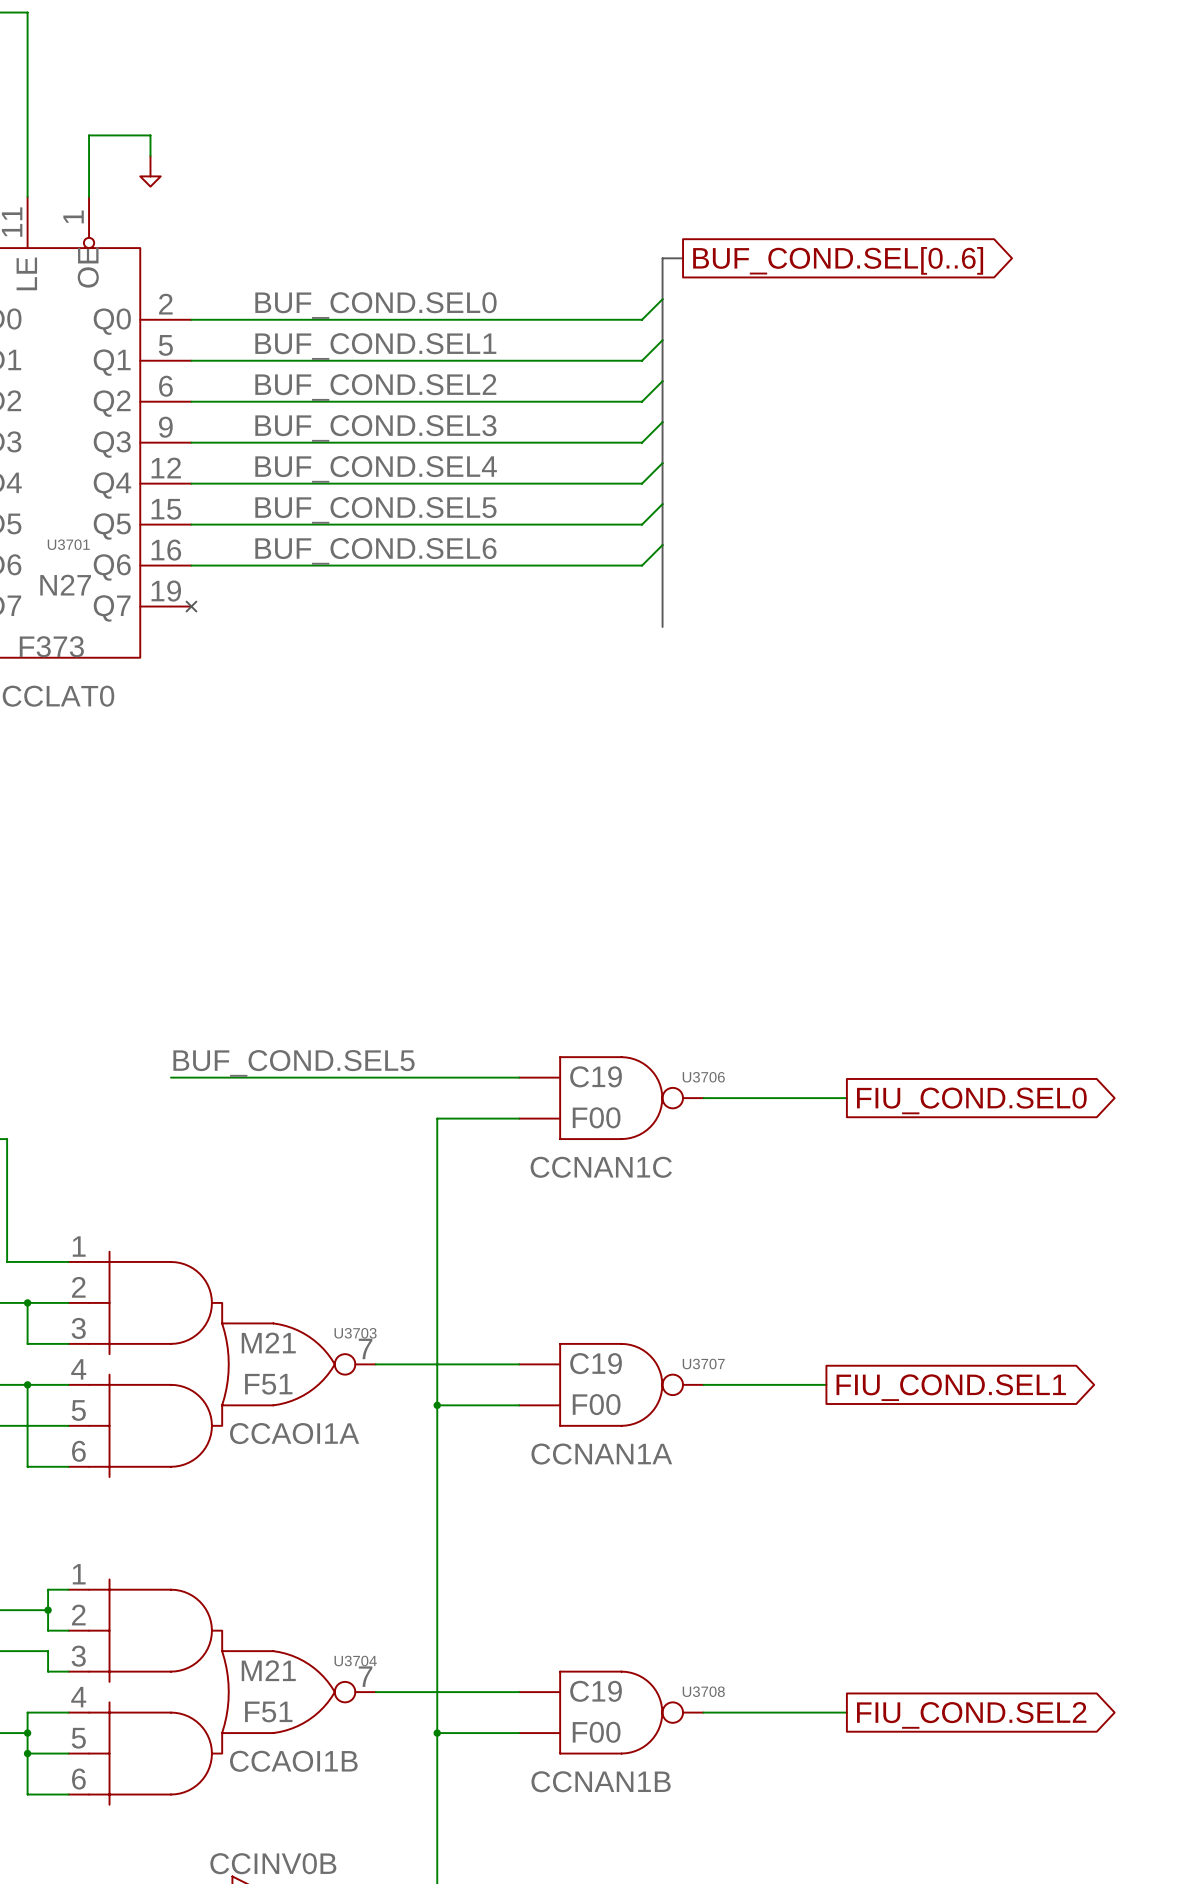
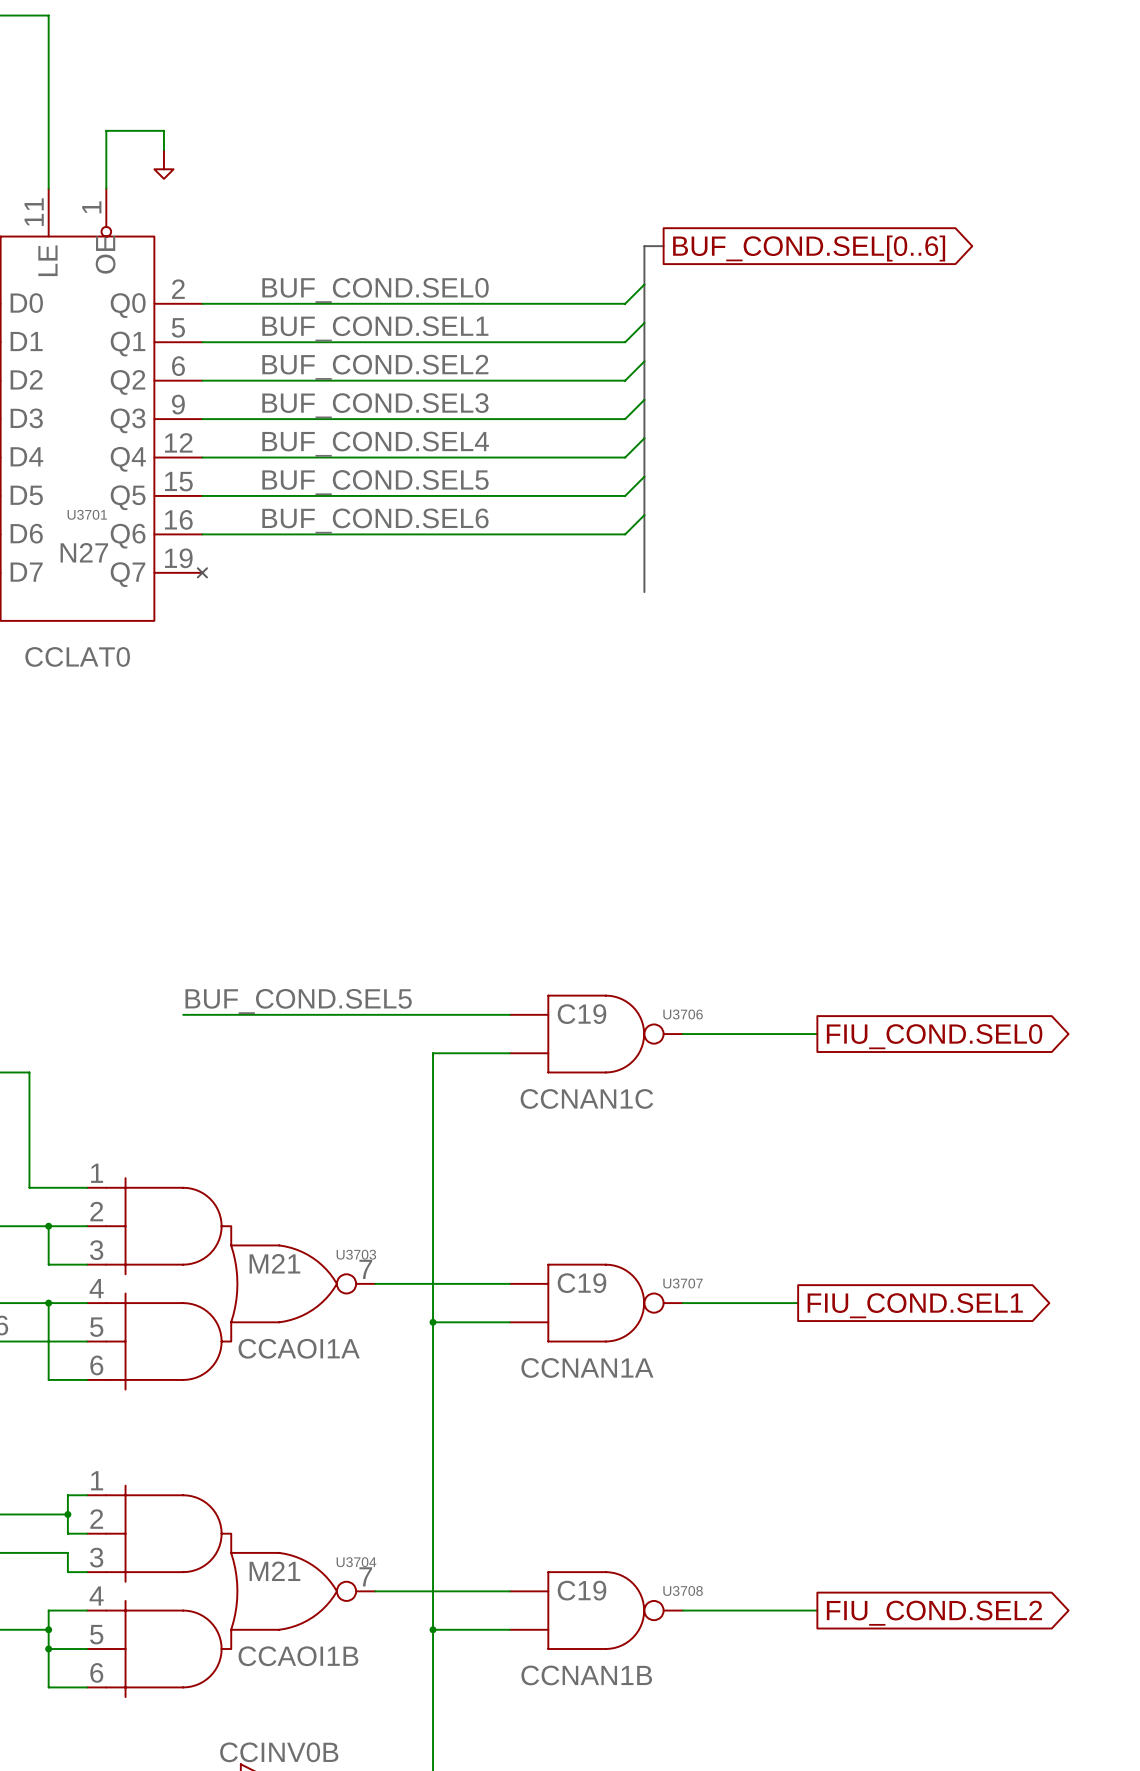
U3701 value: F373 (51, 646) -> none
U3706 value: F00 (596, 1117) -> none
U3703 value: F51 (268, 1384) -> none
U3707 value: F00 (596, 1404) -> none
U3704 value: F51 (268, 1711) -> none
U3708 value: F00 (596, 1732) -> none

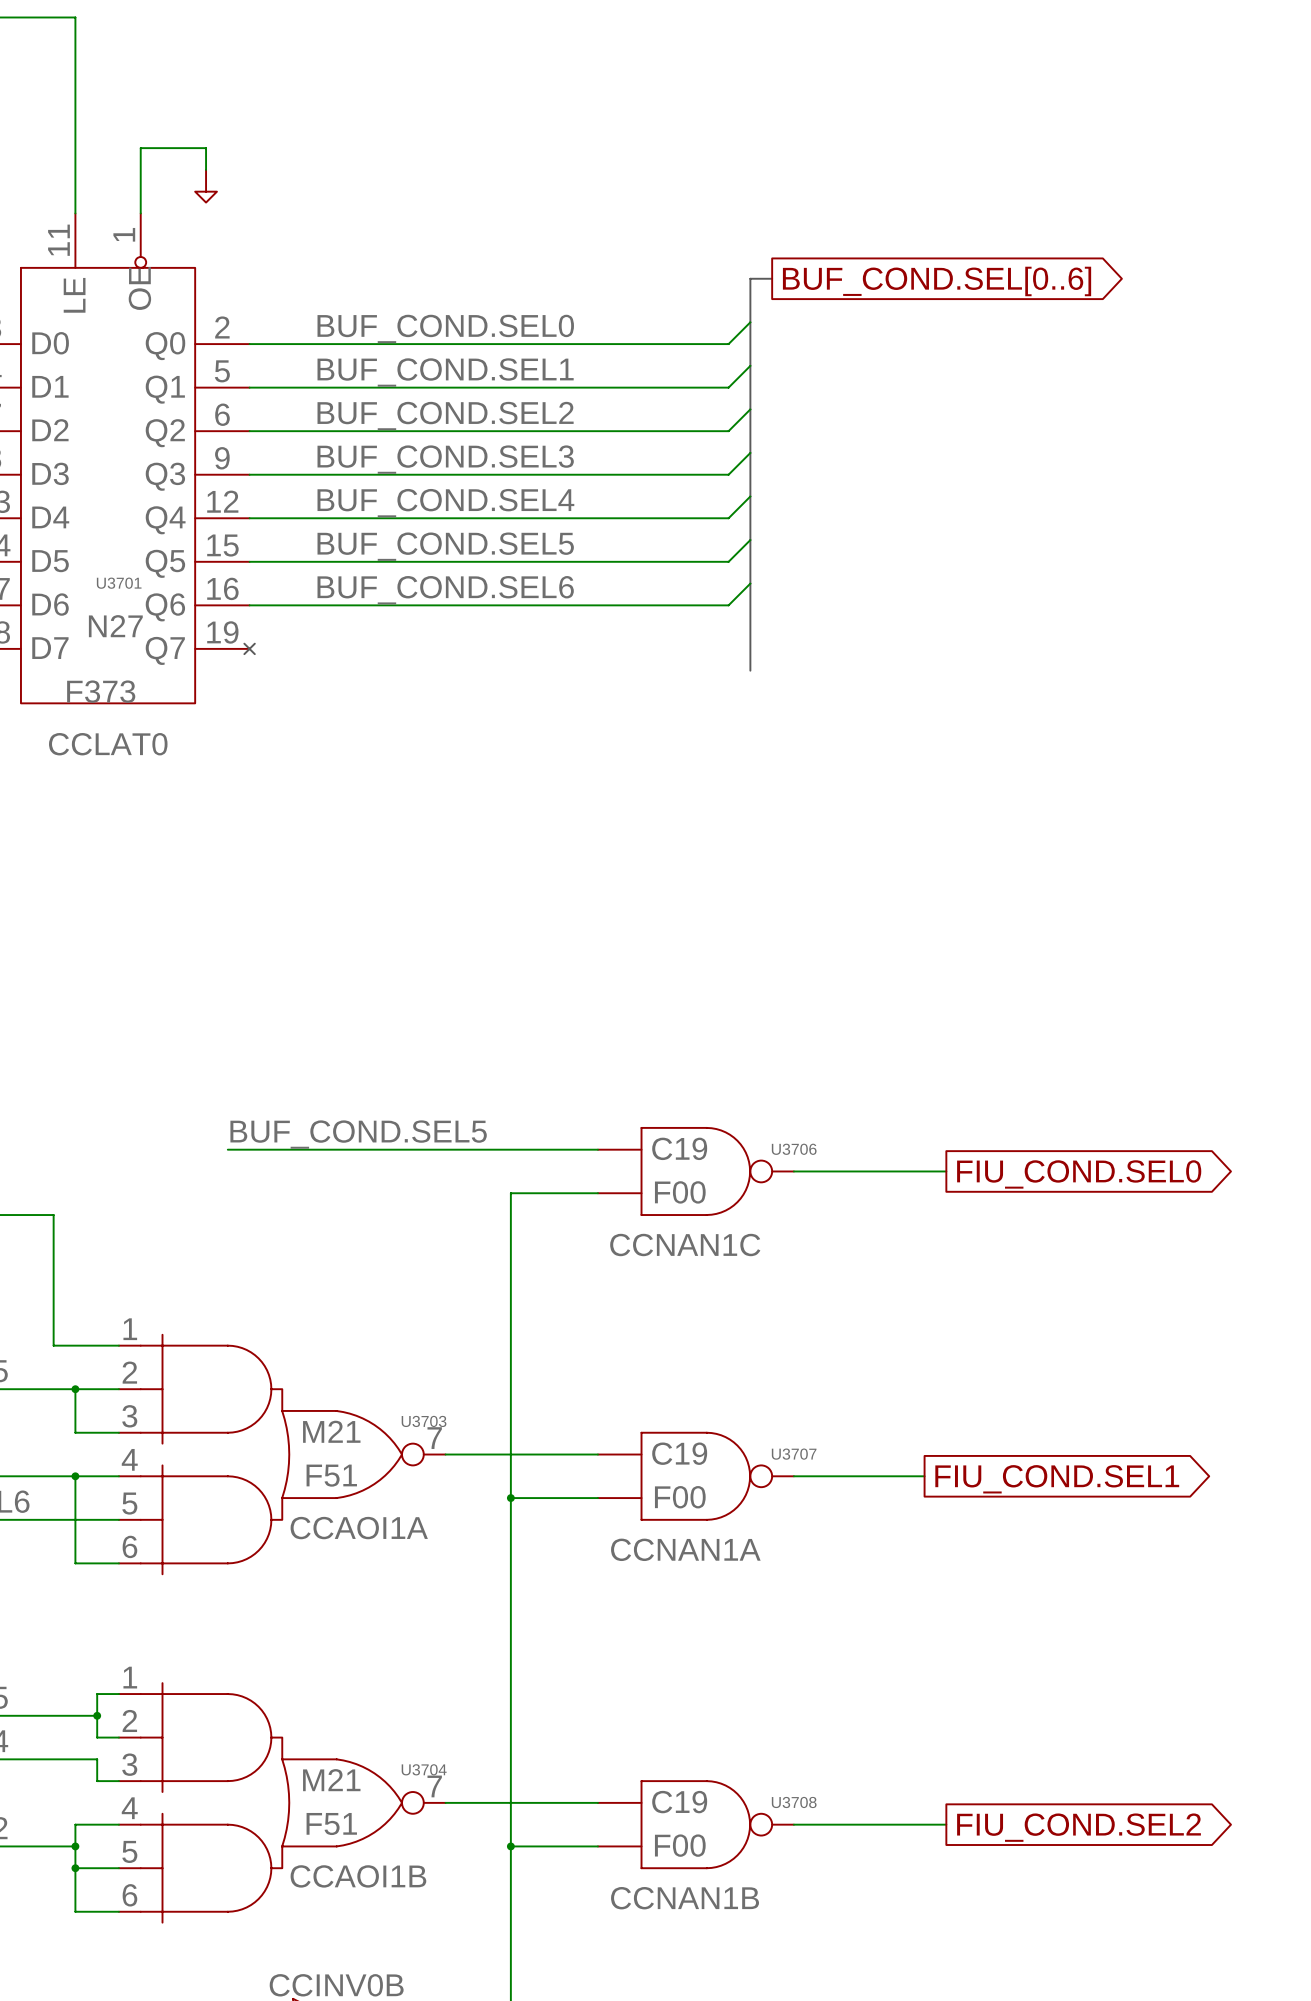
U3701 value: none -> F373 (101, 691)
U3706 value: none -> F00 (680, 1192)
U3703 value: none -> F51 (331, 1475)
U3707 value: none -> F00 (680, 1497)
U3704 value: none -> F51 (331, 1824)
U3708 value: none -> F00 (680, 1845)

